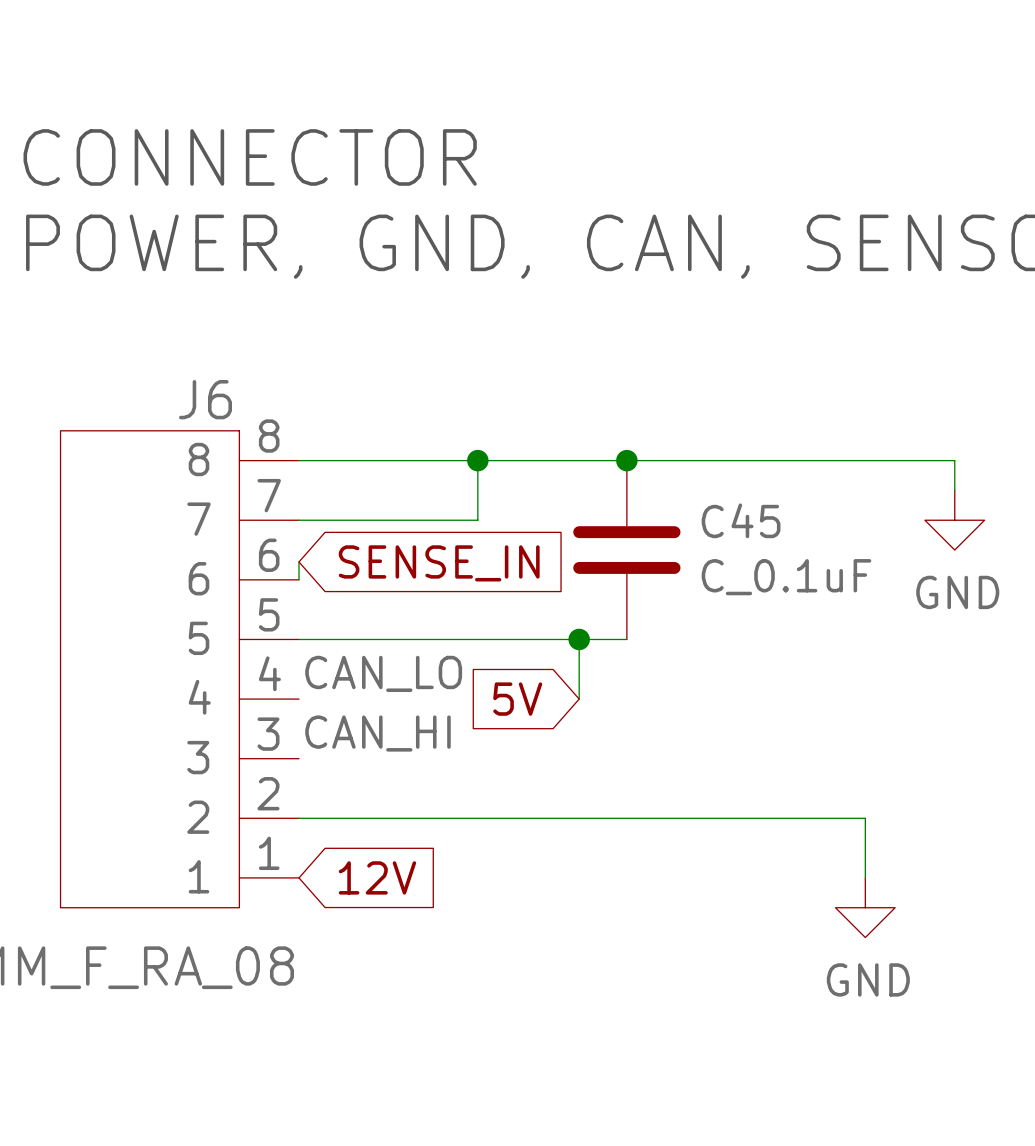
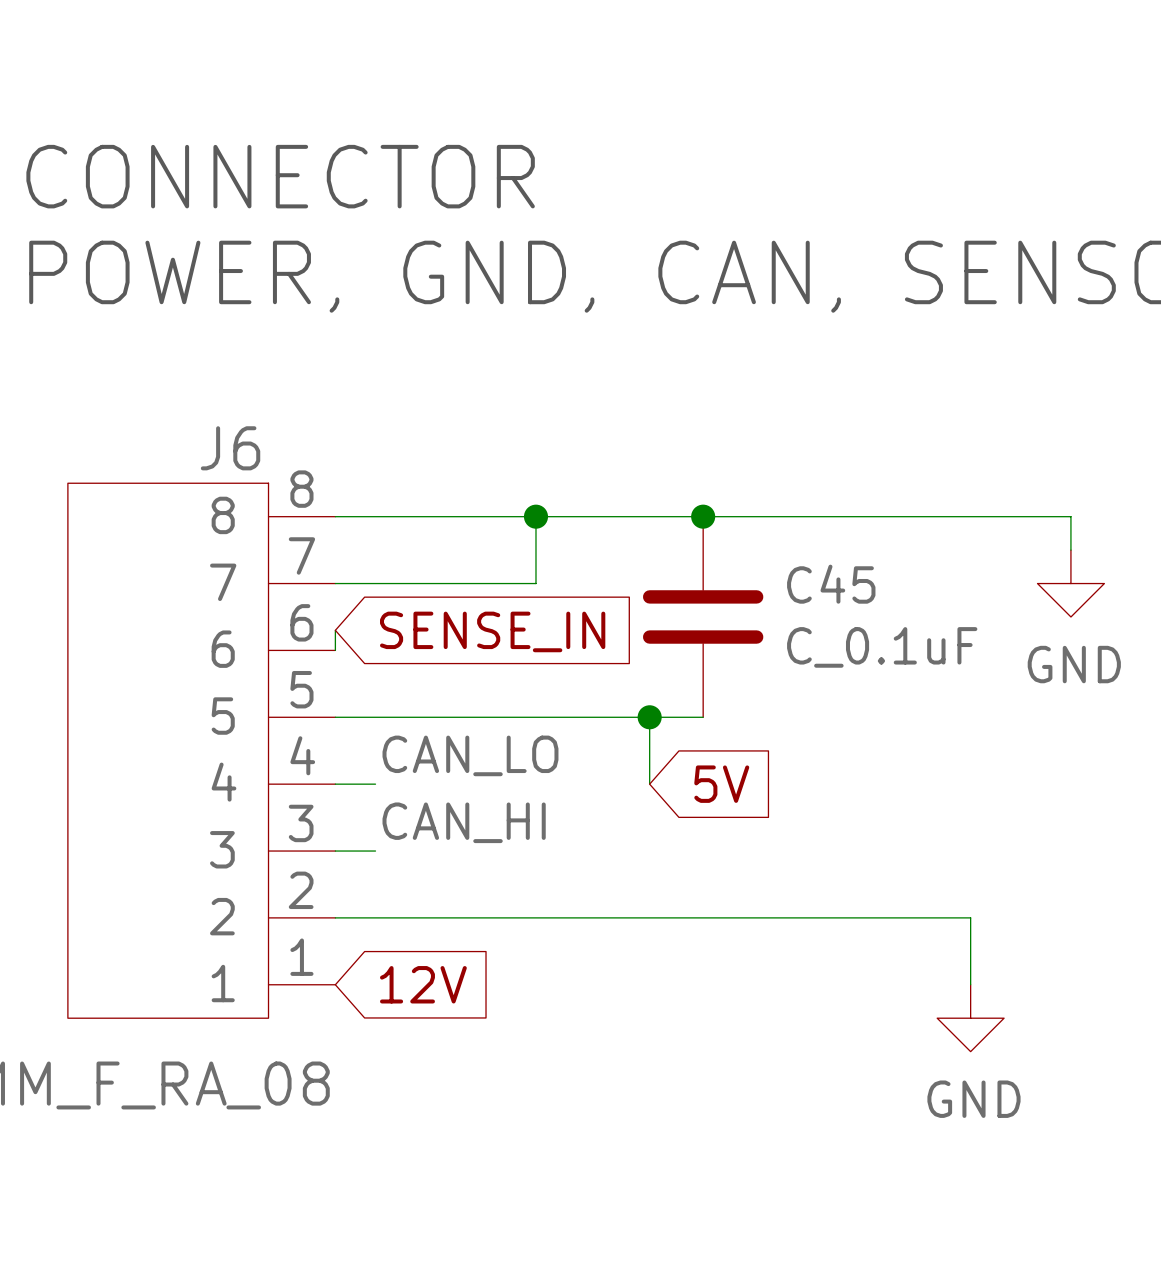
label position: CAN_LO (383, 673) -> CAN_LO (470, 755)
wire: none -> (335, 784) (375, 784)
global label rotation: 0° (517, 699) -> 180° (721, 784)
label position: CAN_HI (377, 733) -> CAN_HI (464, 822)
wire: none -> (335, 851) (375, 851)

